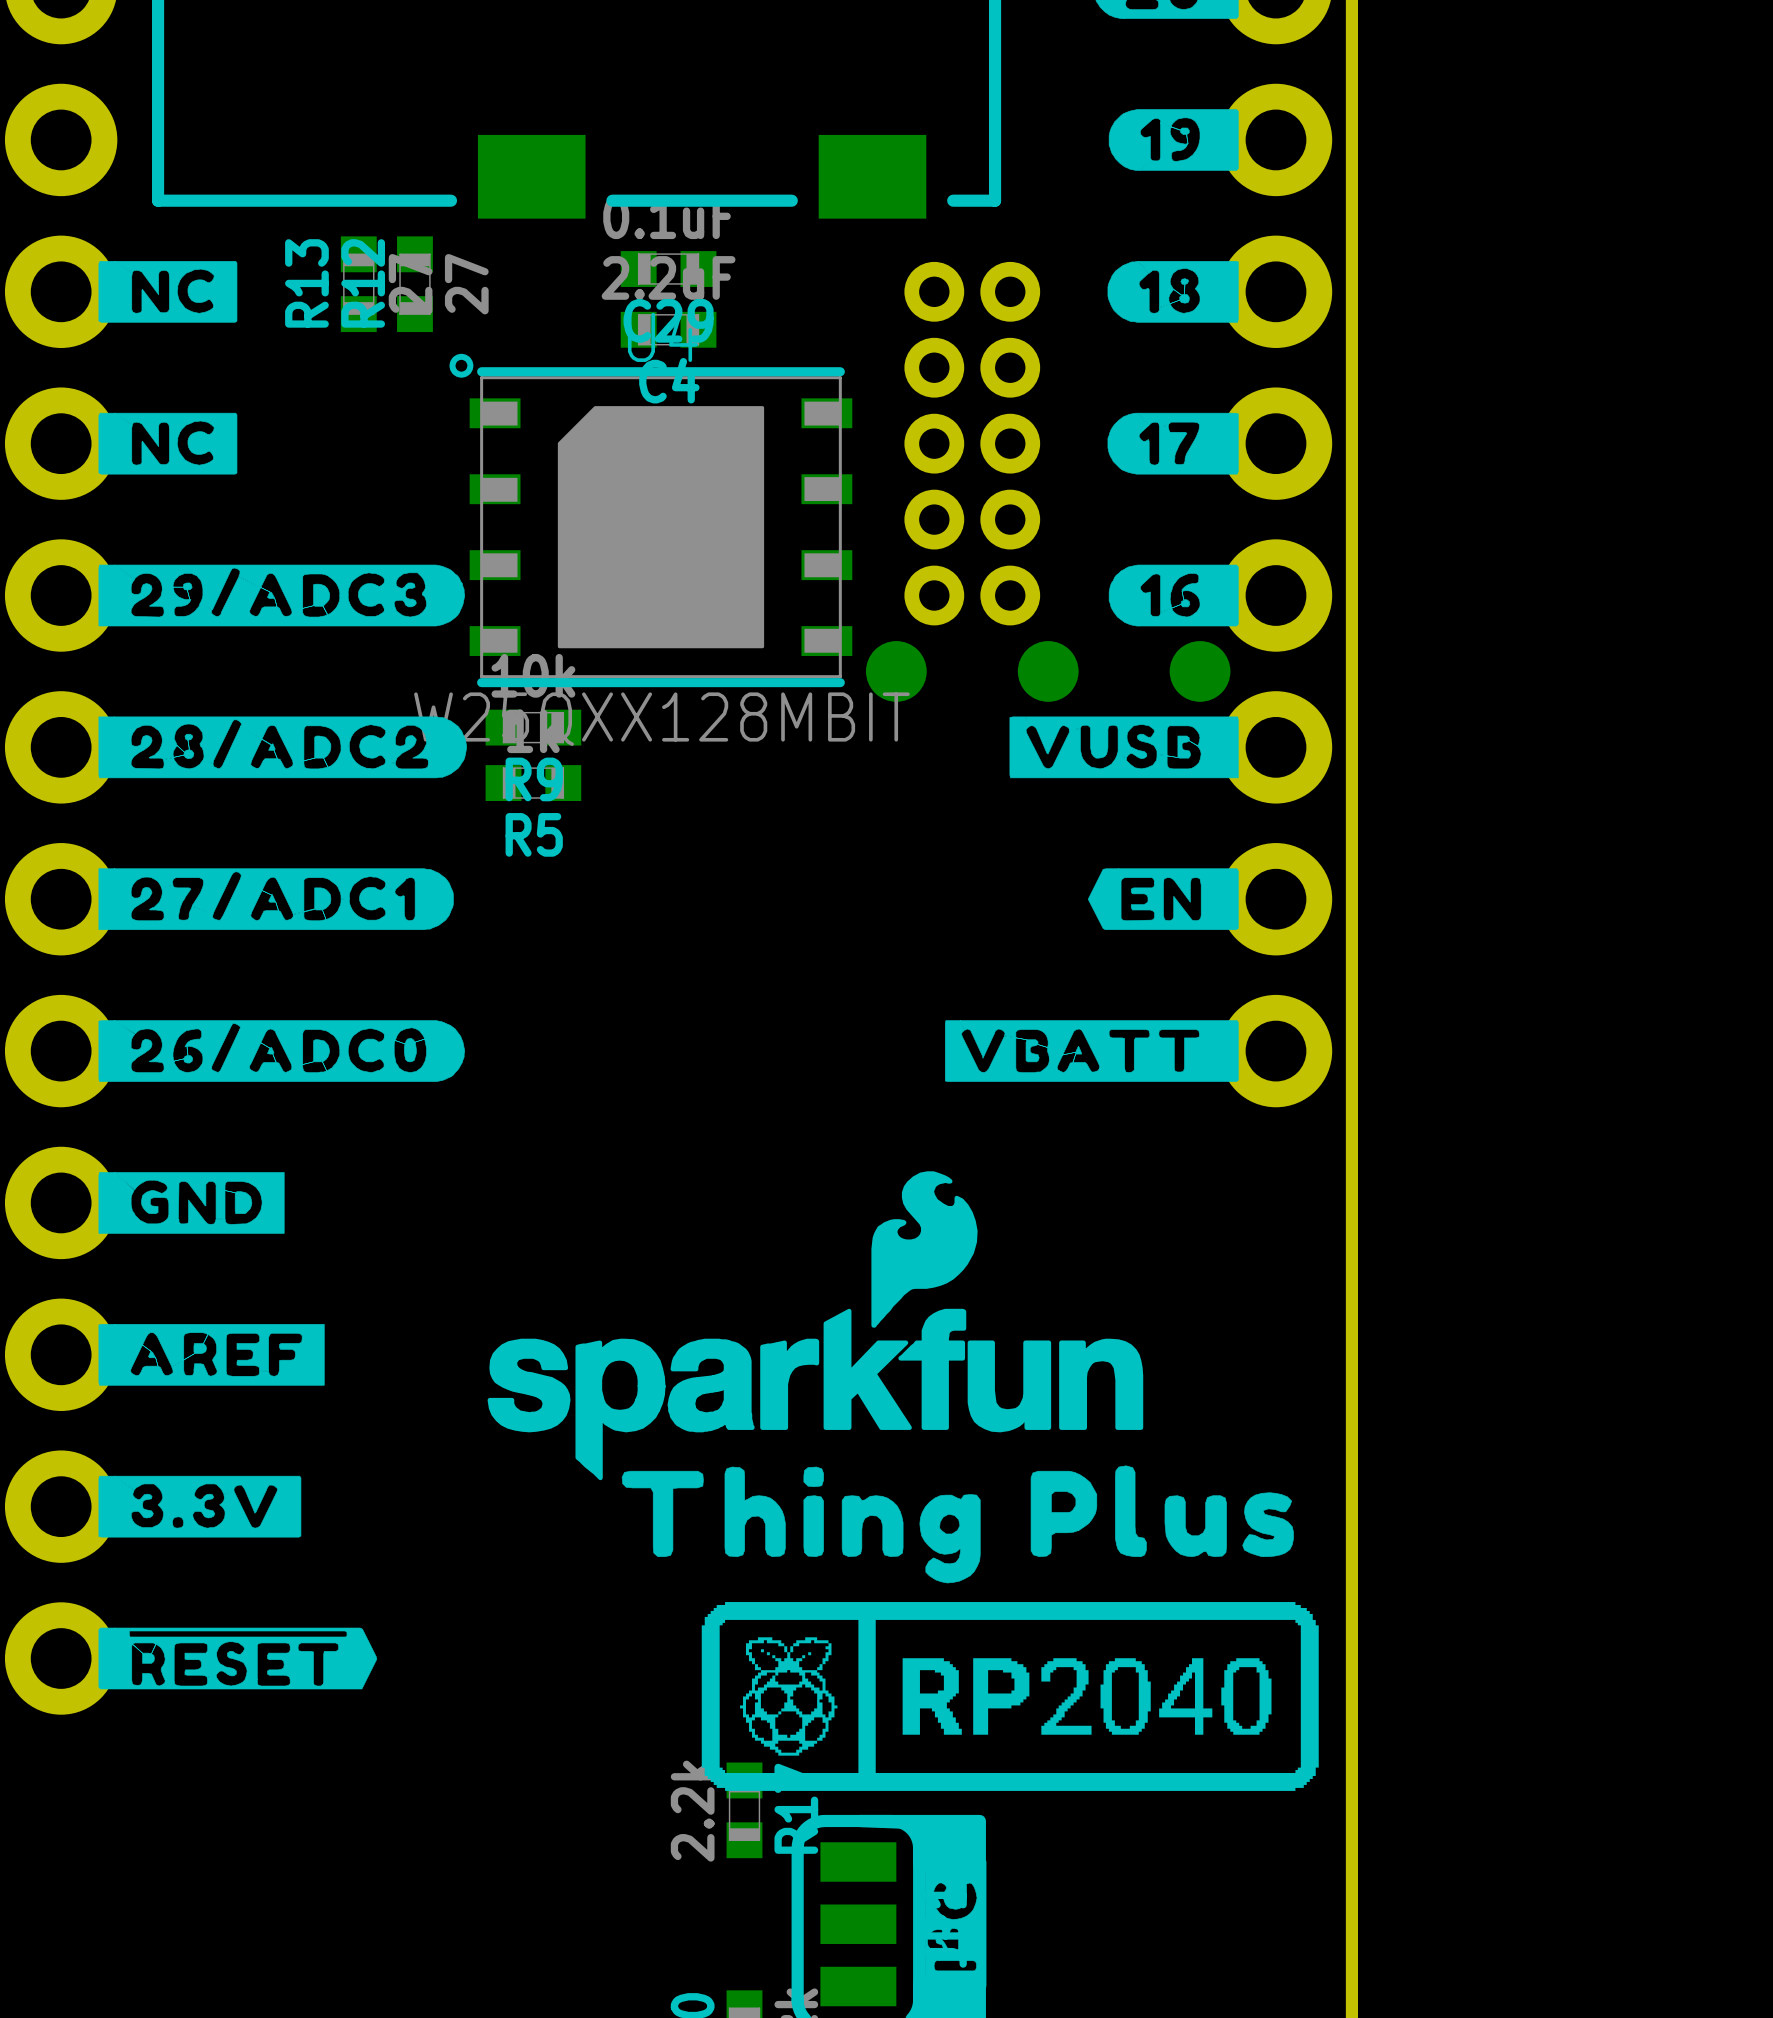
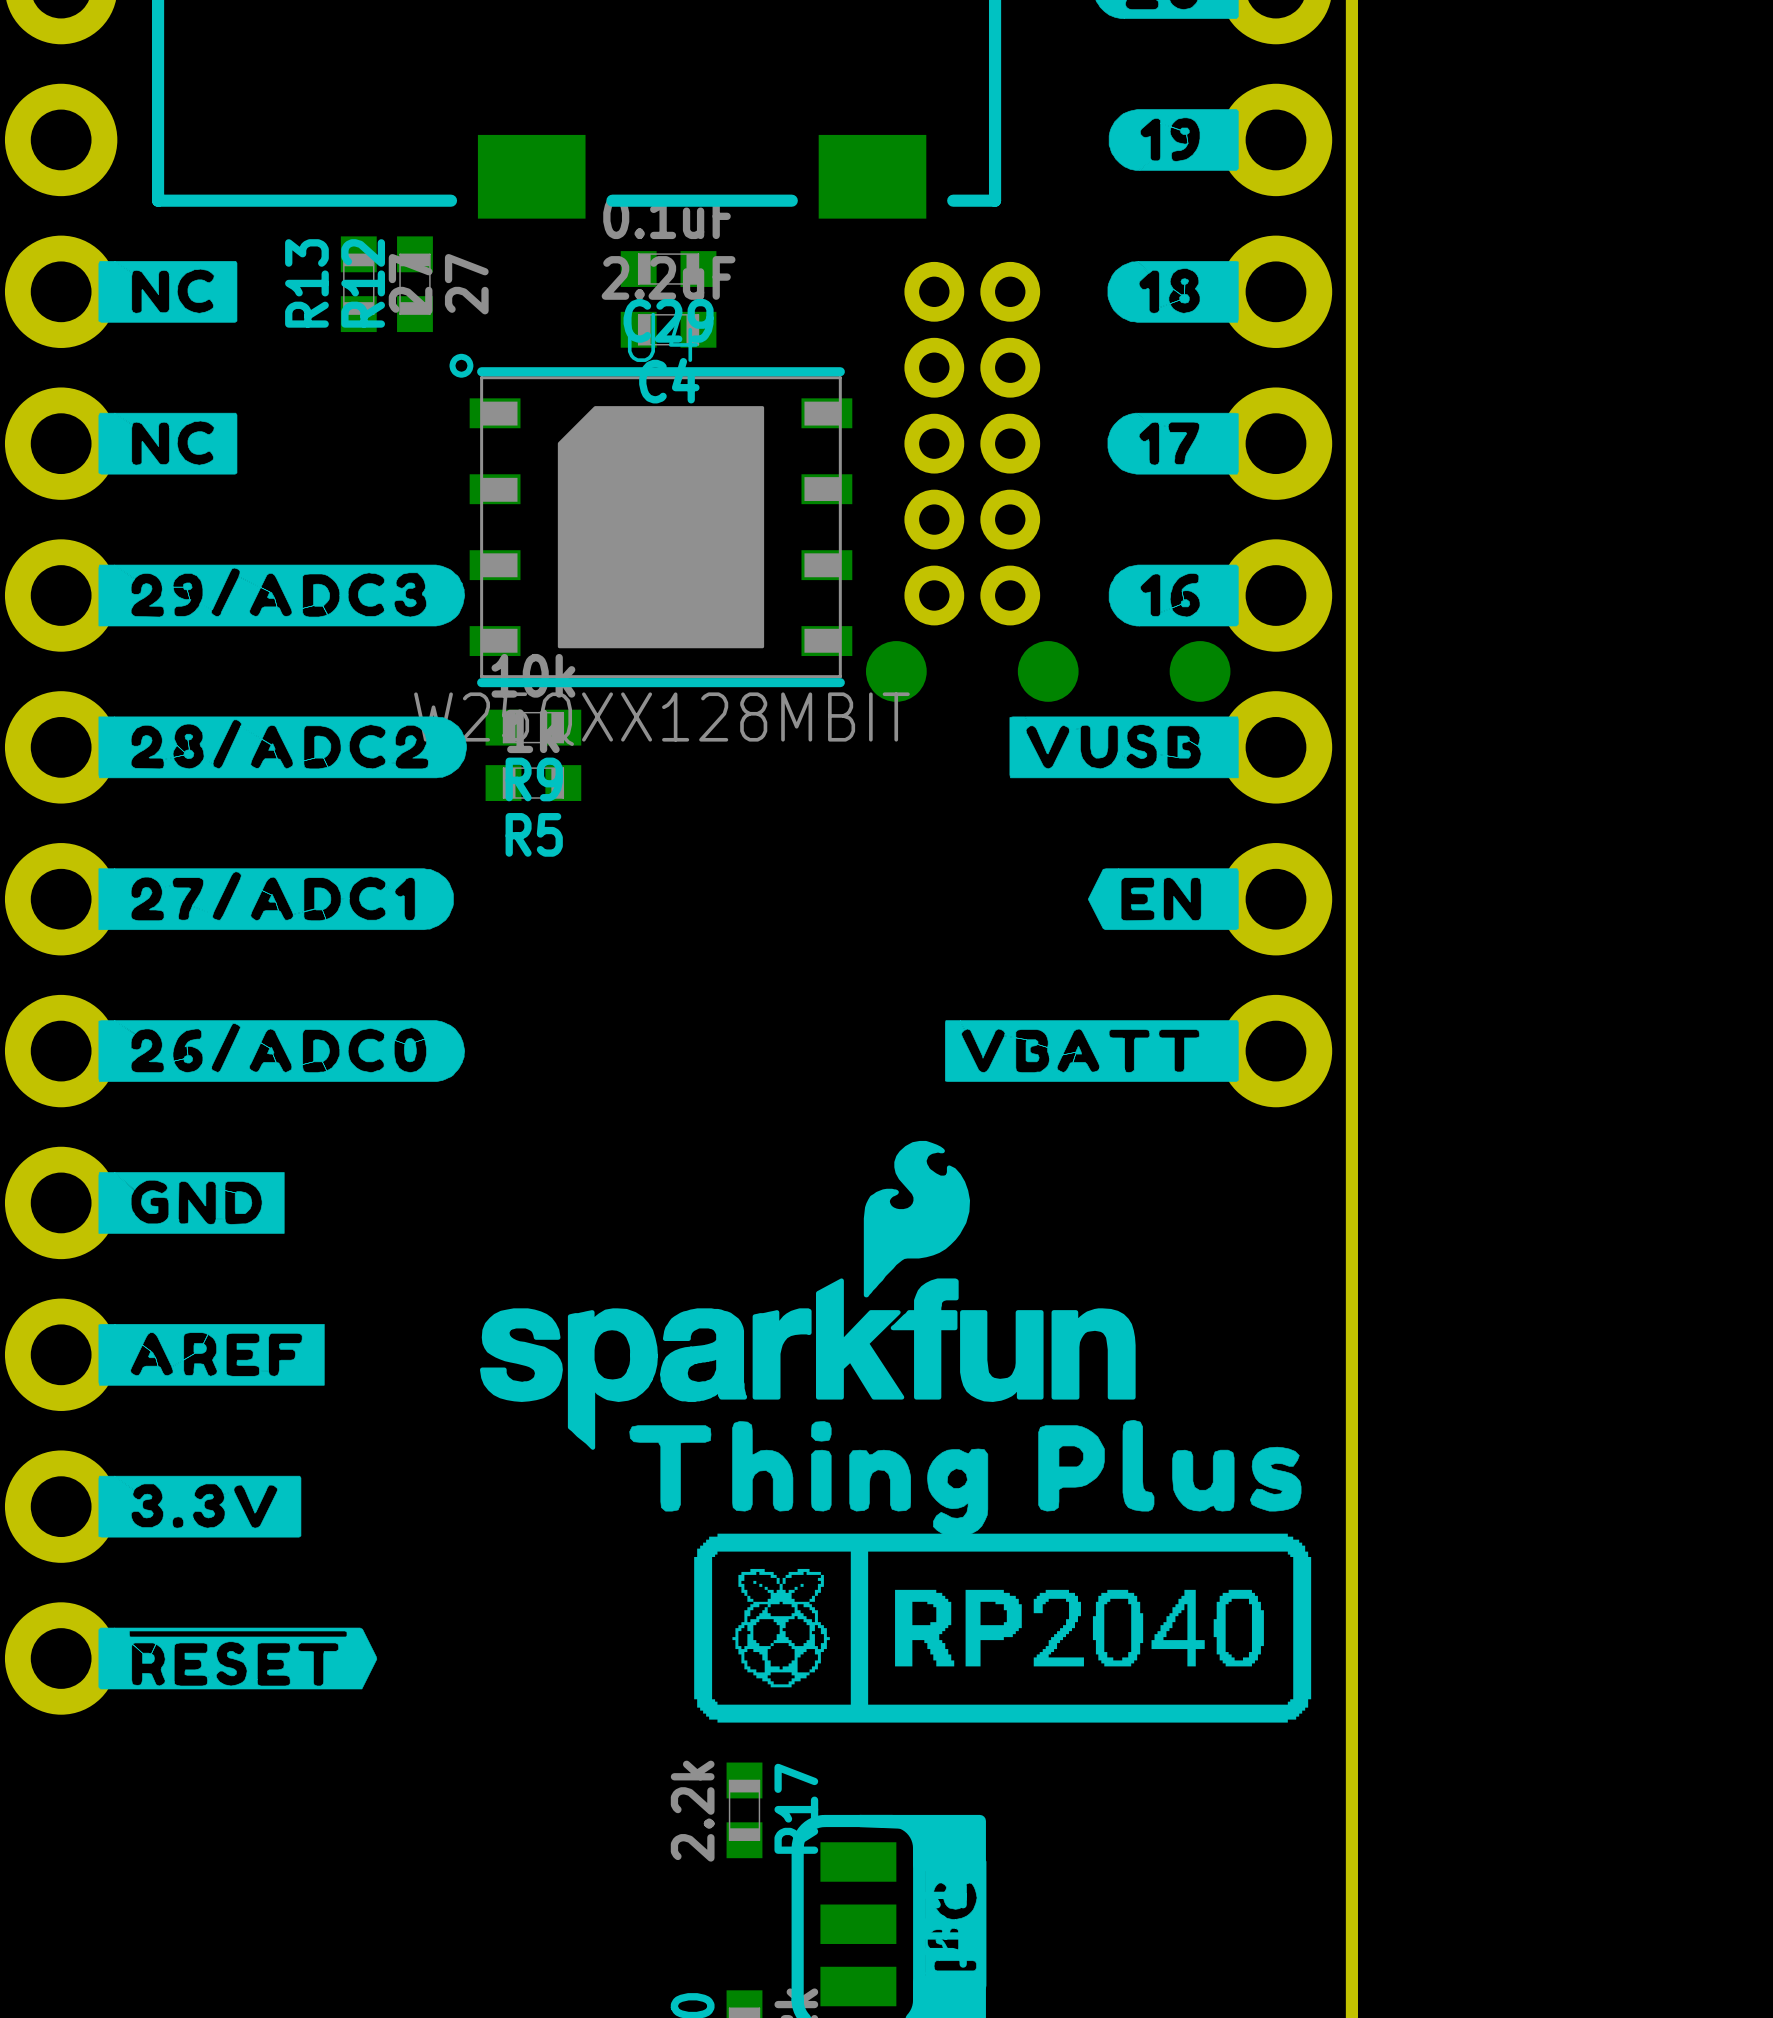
drawing position: (815, 1325) -> (807, 1295)
drawing position: (957, 1524) -> (965, 1478)
drawing position: (1010, 1696) -> (1002, 1628)

